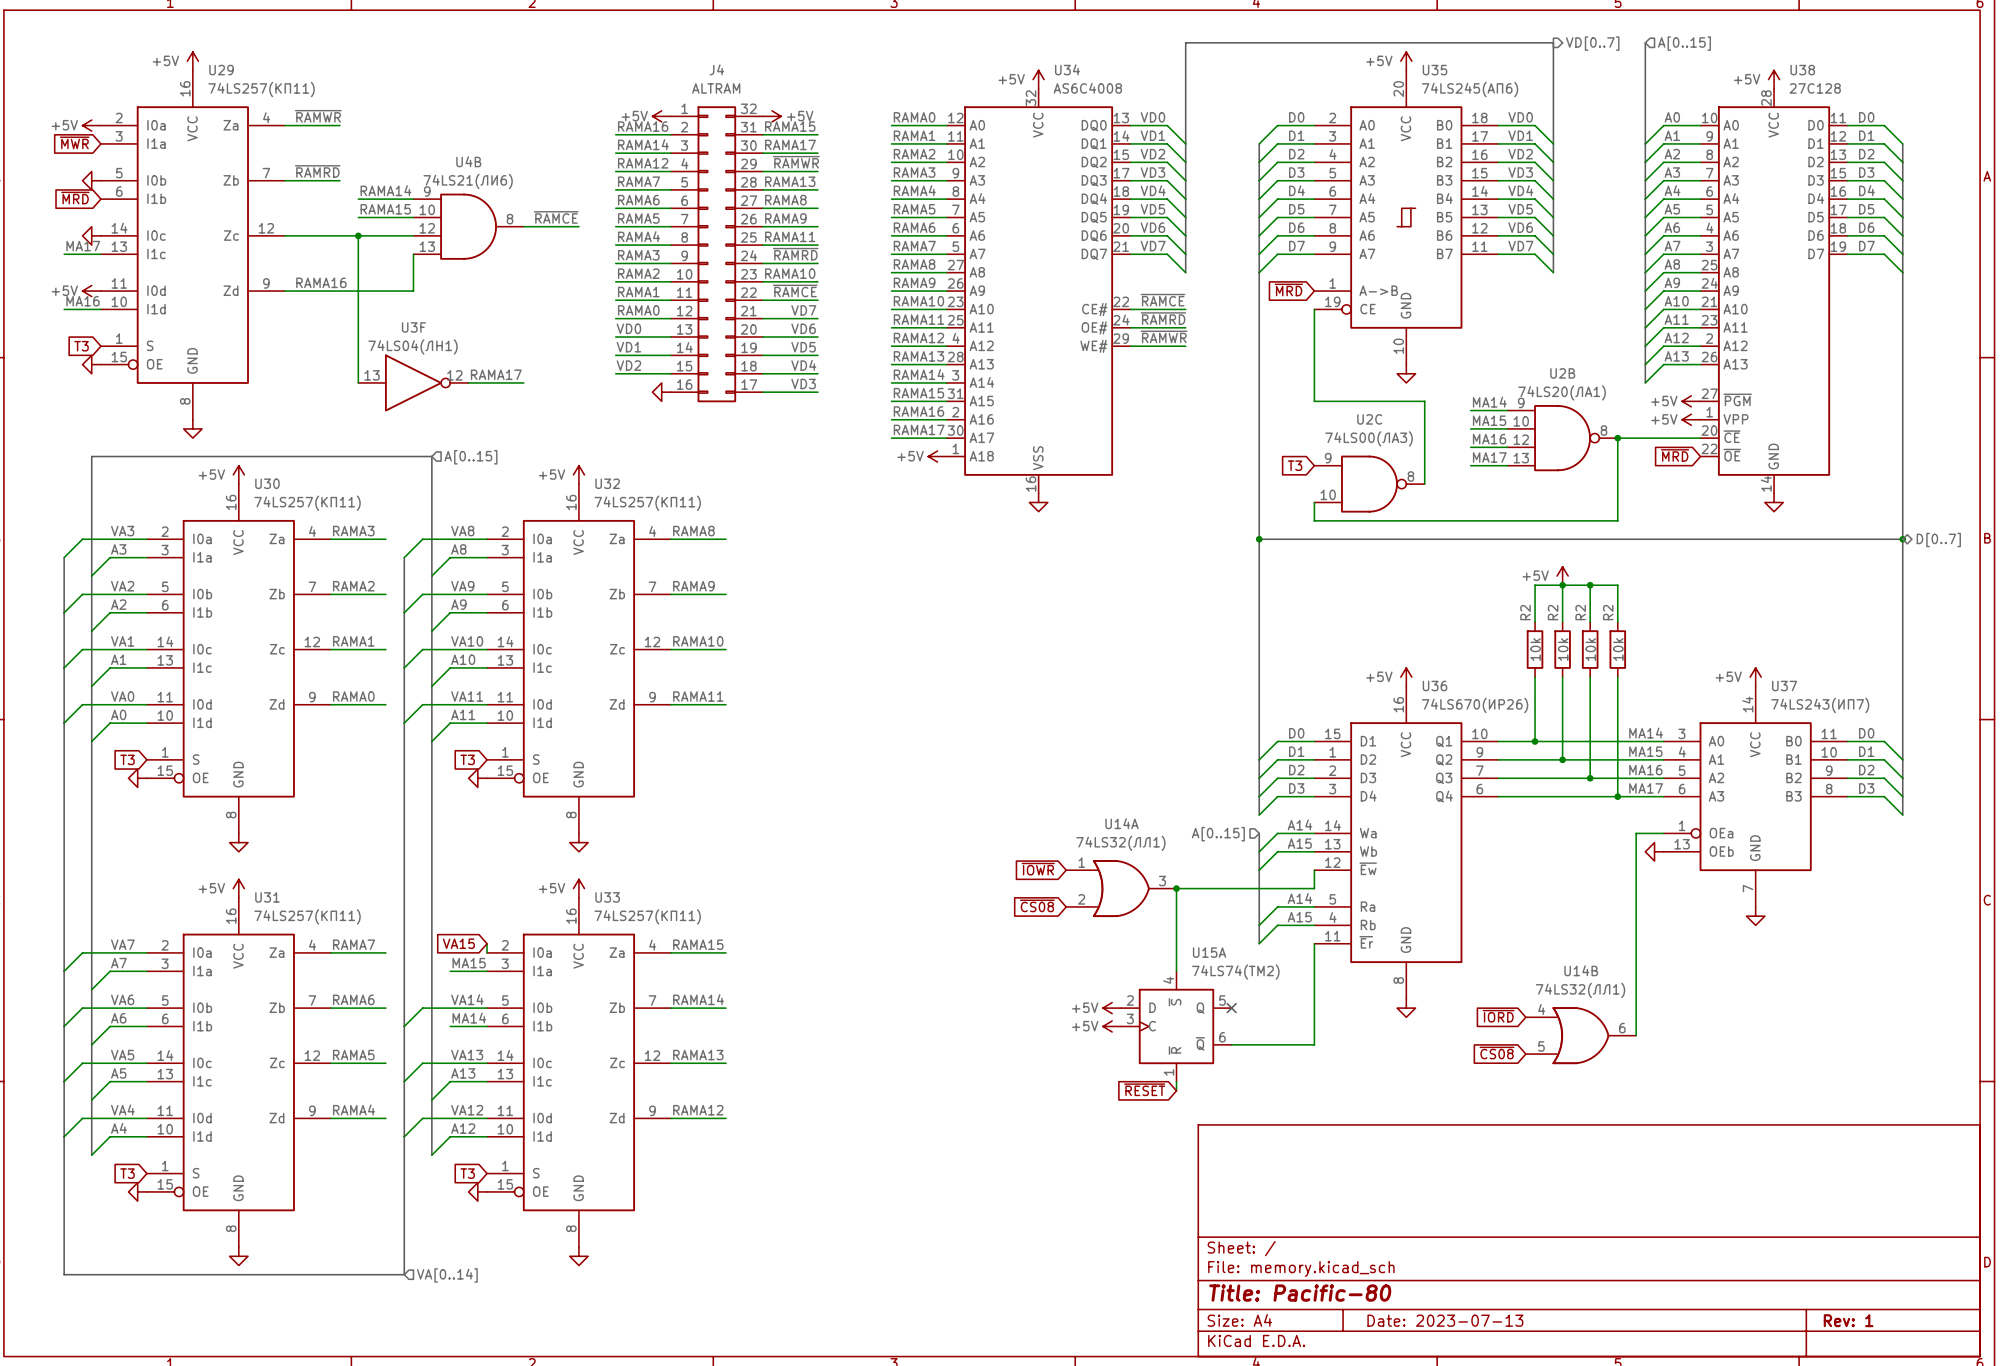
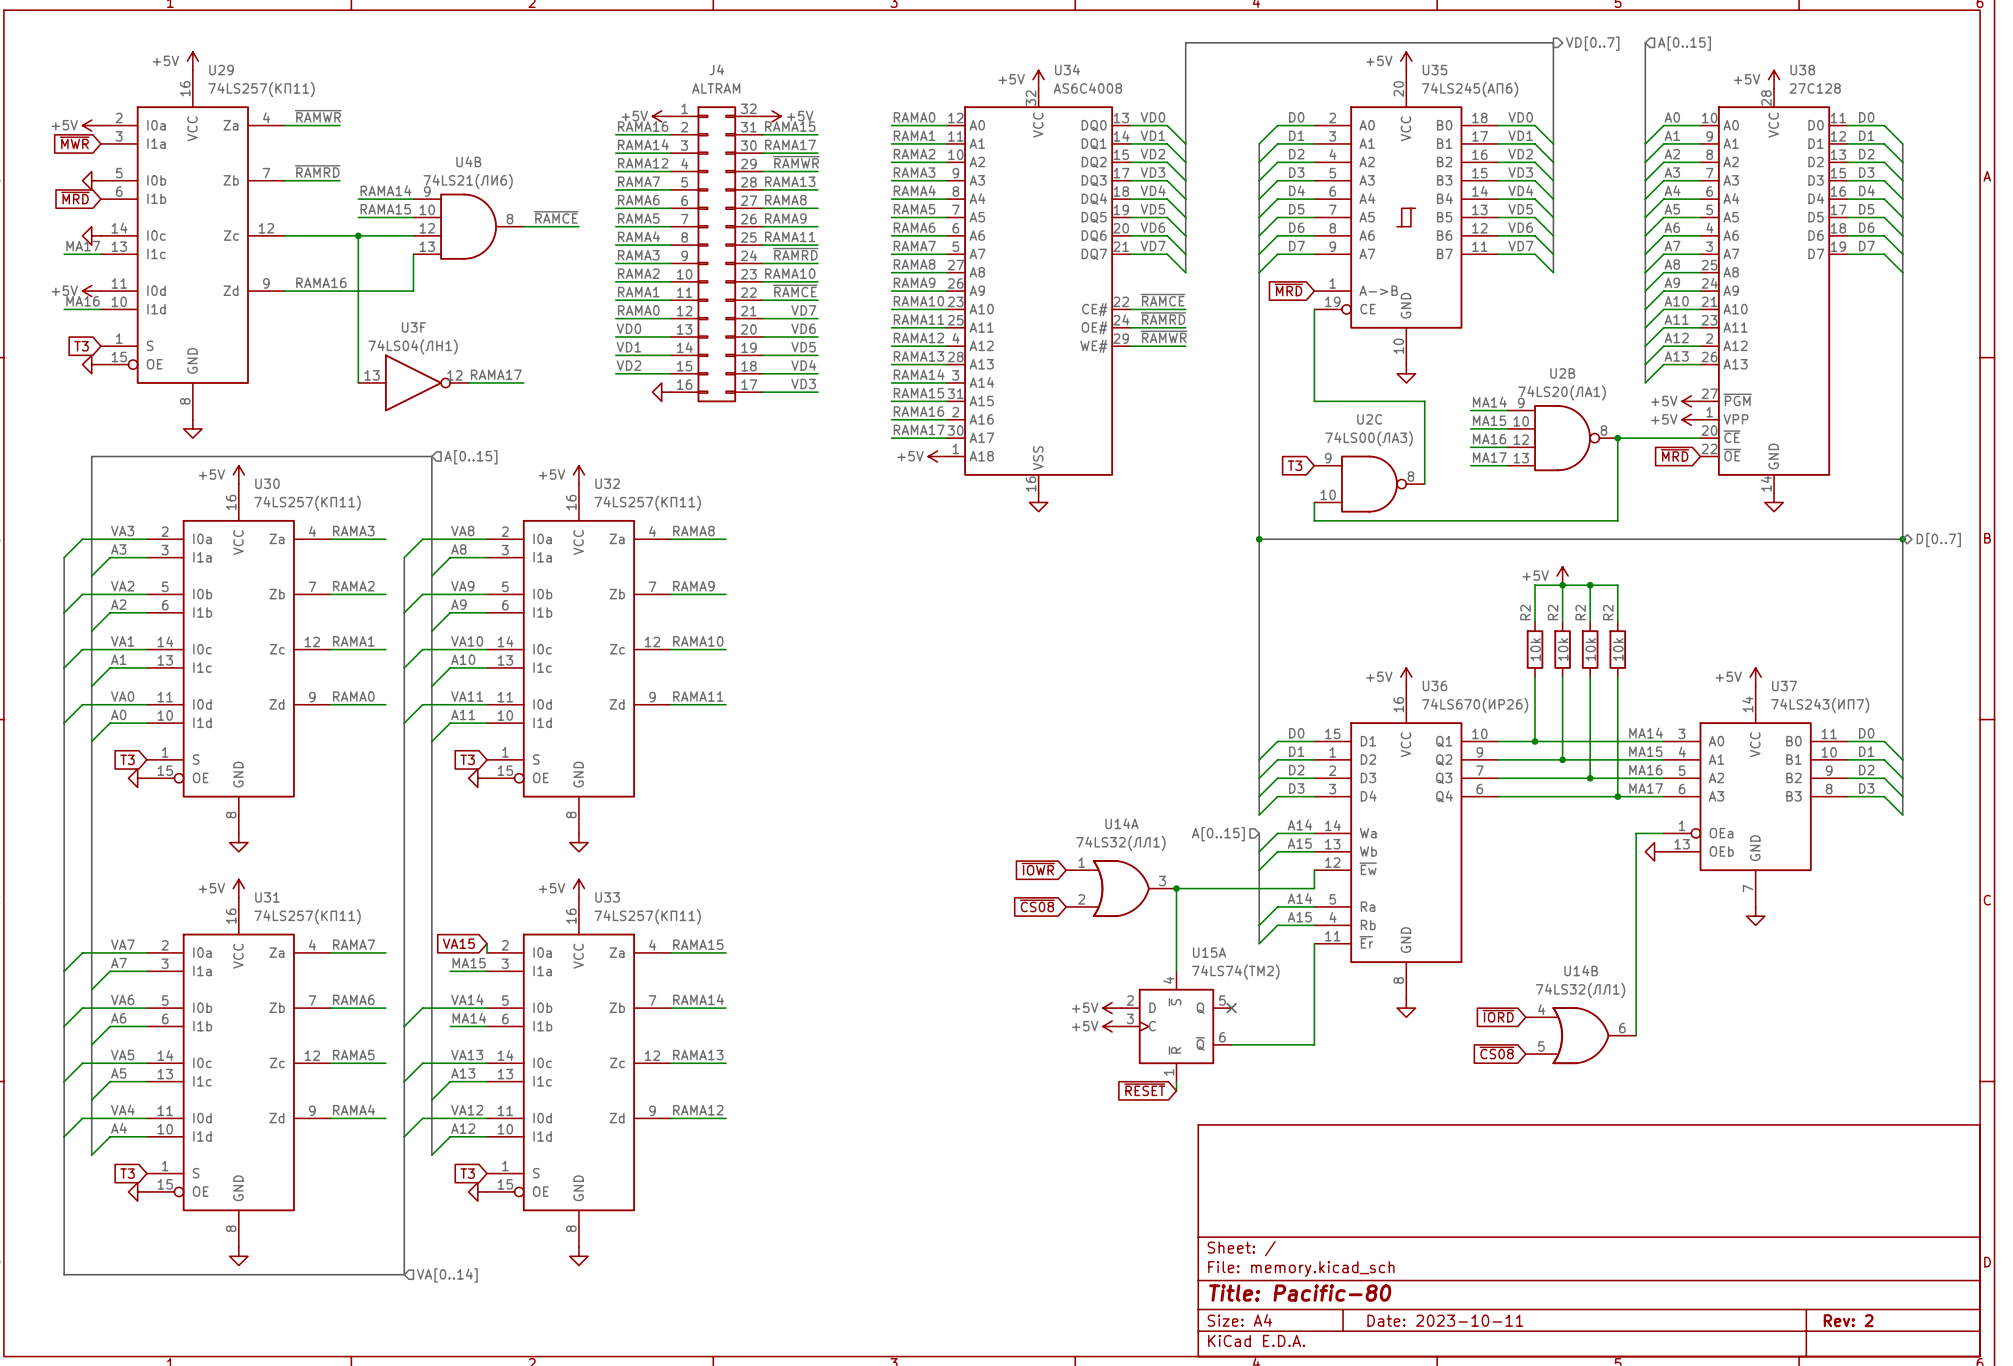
title block: Date: 2023-07-13 (1445, 1320) -> Date: 2023-10-11 (1445, 1320)
title block: Rev: 1 (1848, 1320) -> Rev: 2 (1848, 1320)

